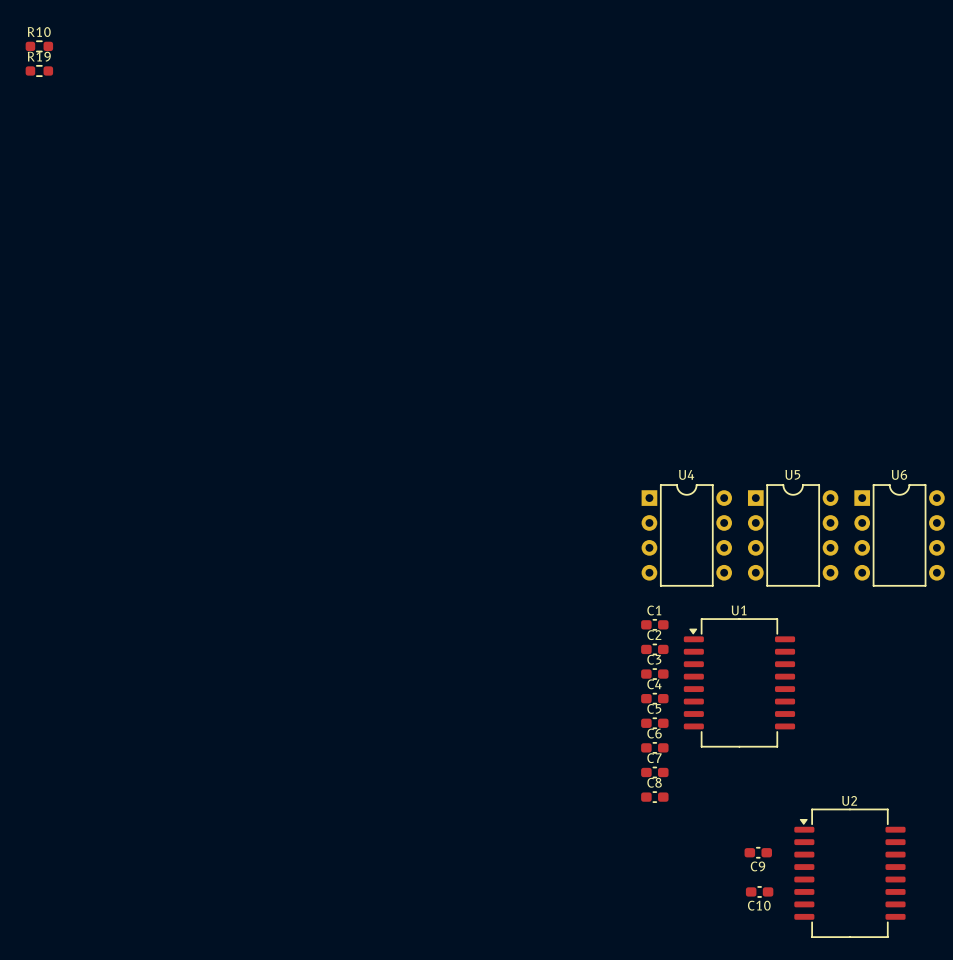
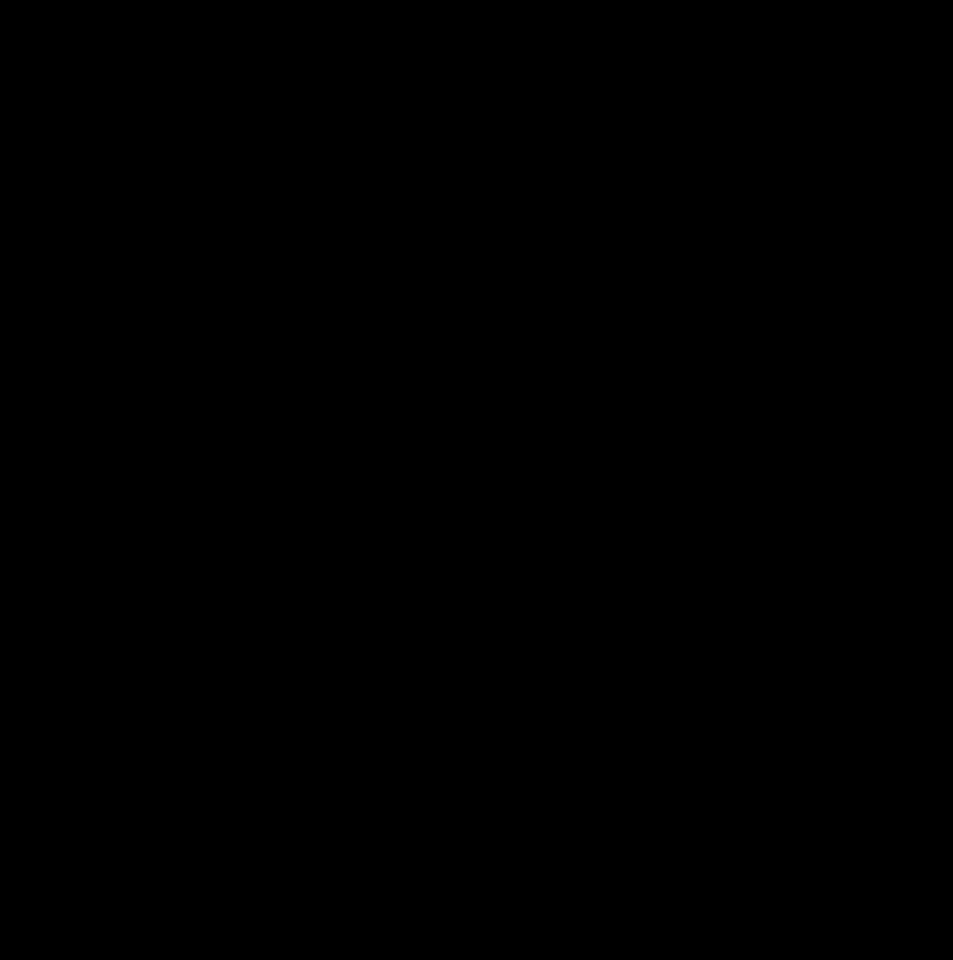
R10: (39, 46) -> none
R19: (39, 70) -> none
U4: (686, 535) -> none
U5: (793, 535) -> none
U6: (899, 535) -> none
C1: (654, 624) -> none
C2: (654, 649) -> none
C3: (654, 674) -> none
U1: (739, 682) -> none
C4: (654, 698) -> none
C5: (654, 723) -> none
C6: (654, 747) -> none
C7: (654, 772) -> none
C8: (654, 797) -> none
C9: (758, 852) -> none
U2: (849, 873) -> none
C10: (759, 891) -> none

